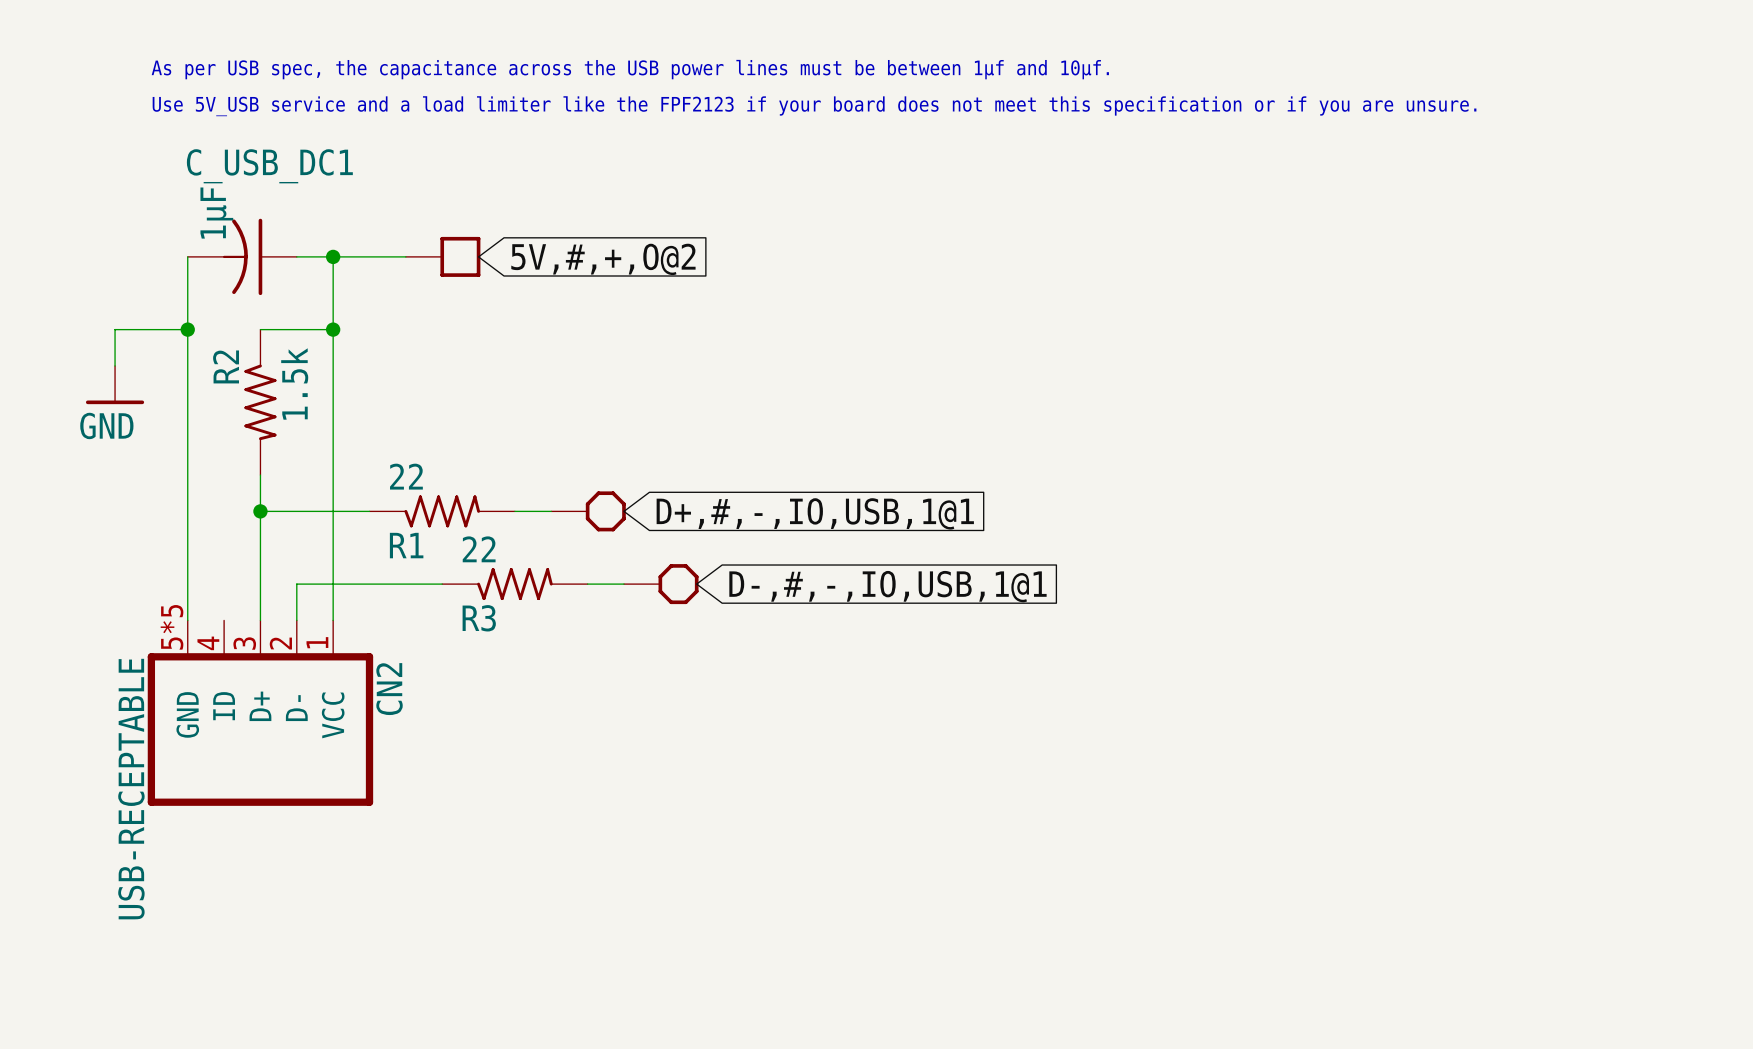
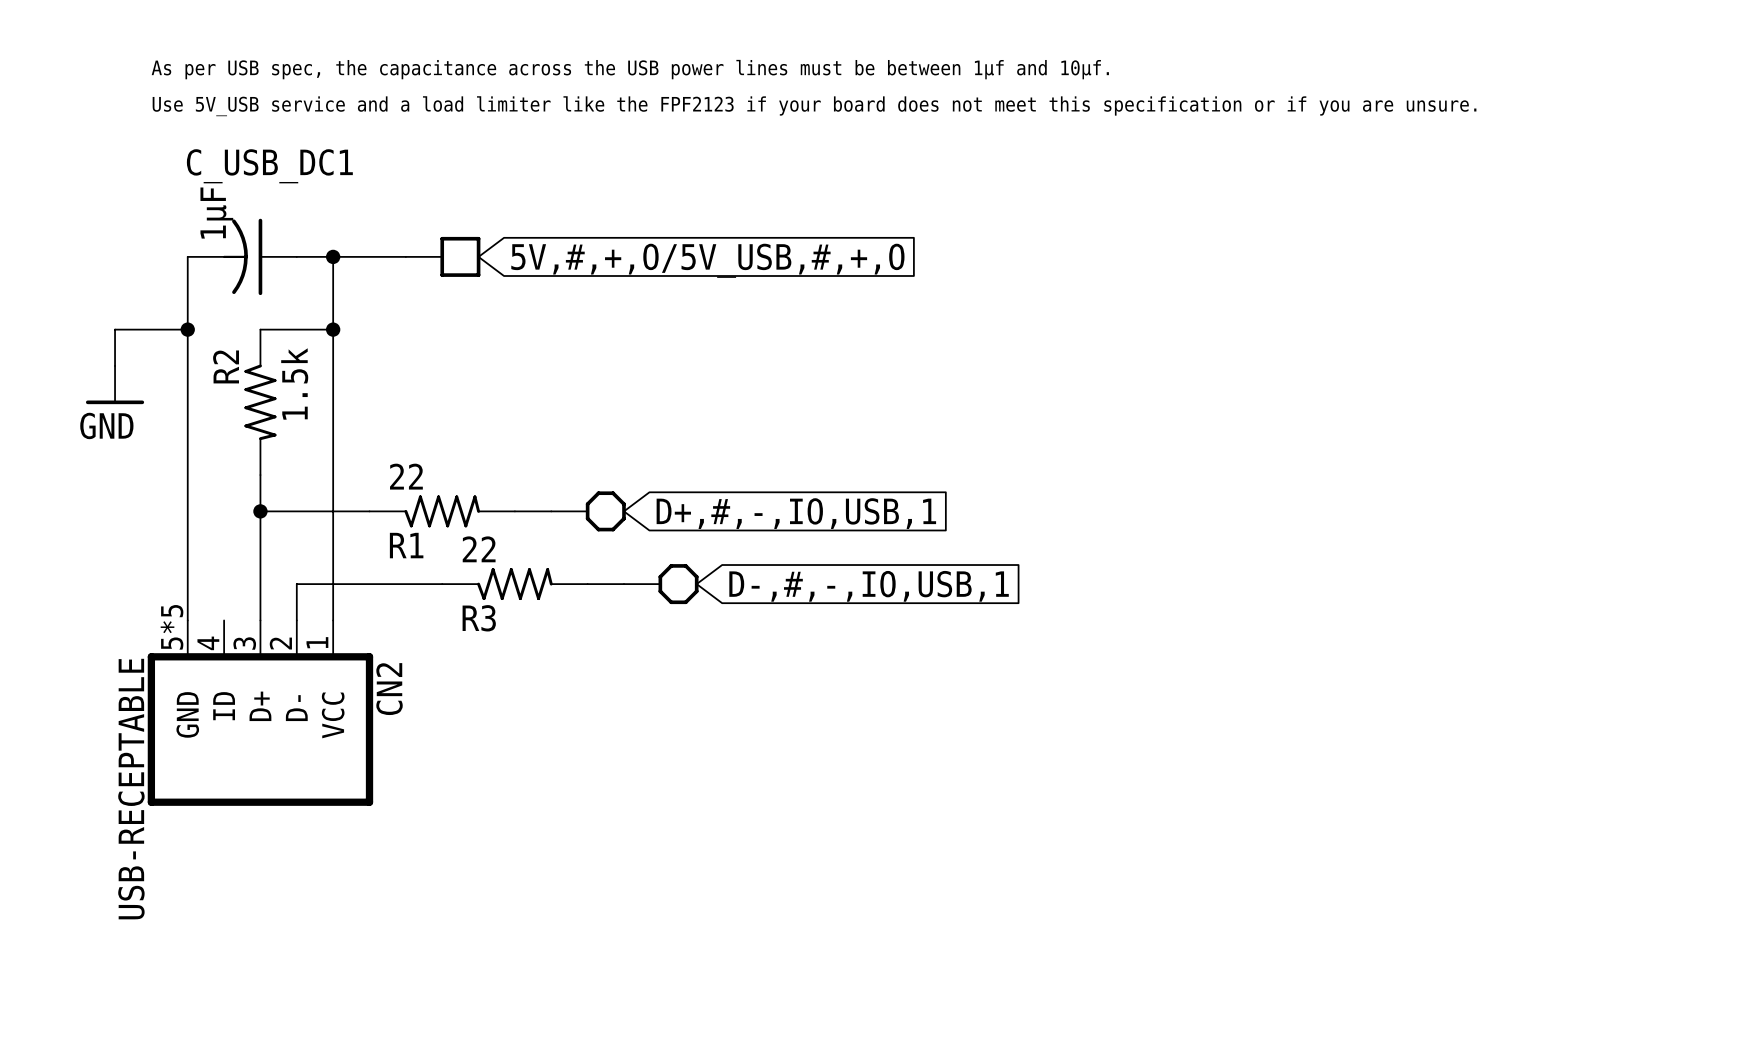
global label: 5V,#,+,O@2 (603, 259) -> 5V,#,+,O/5V_USB,#,+,O (707, 260)
global label: D+,#,-,IO,USB,1@1 (815, 513) -> D+,#,-,IO,USB,1 (796, 513)
global label: D-,#,-,IO,USB,1@1 (887, 586) -> D-,#,-,IO,USB,1 (869, 586)

